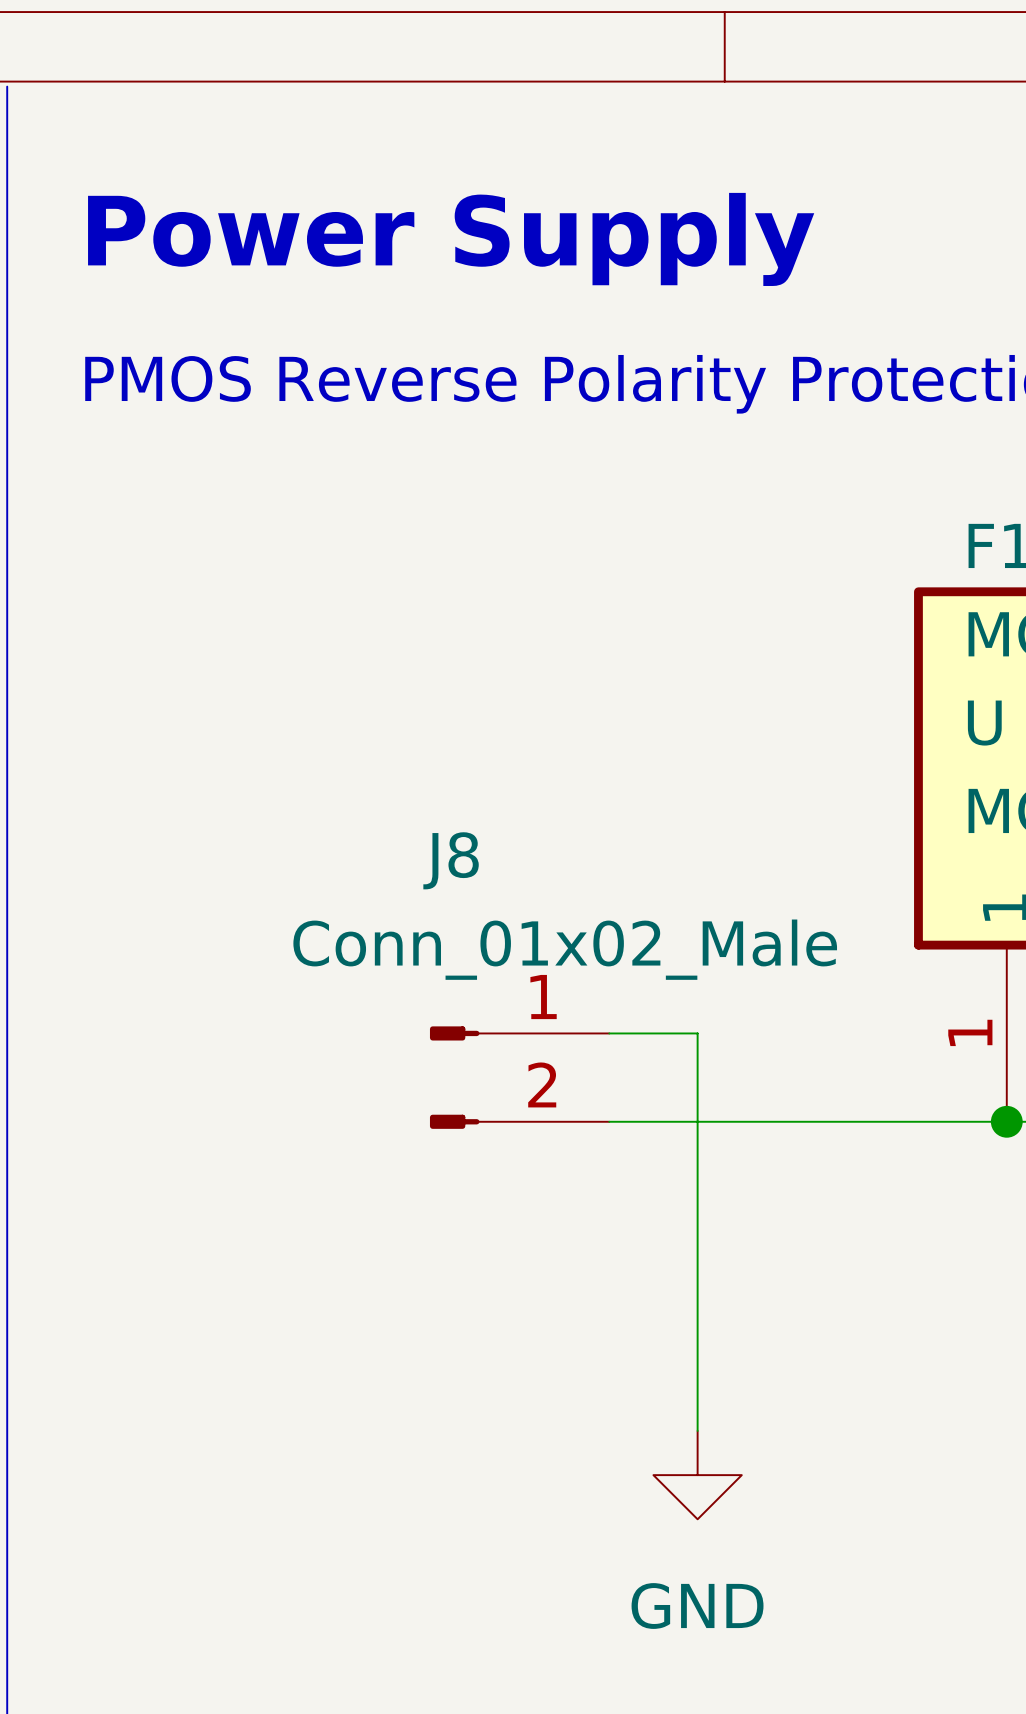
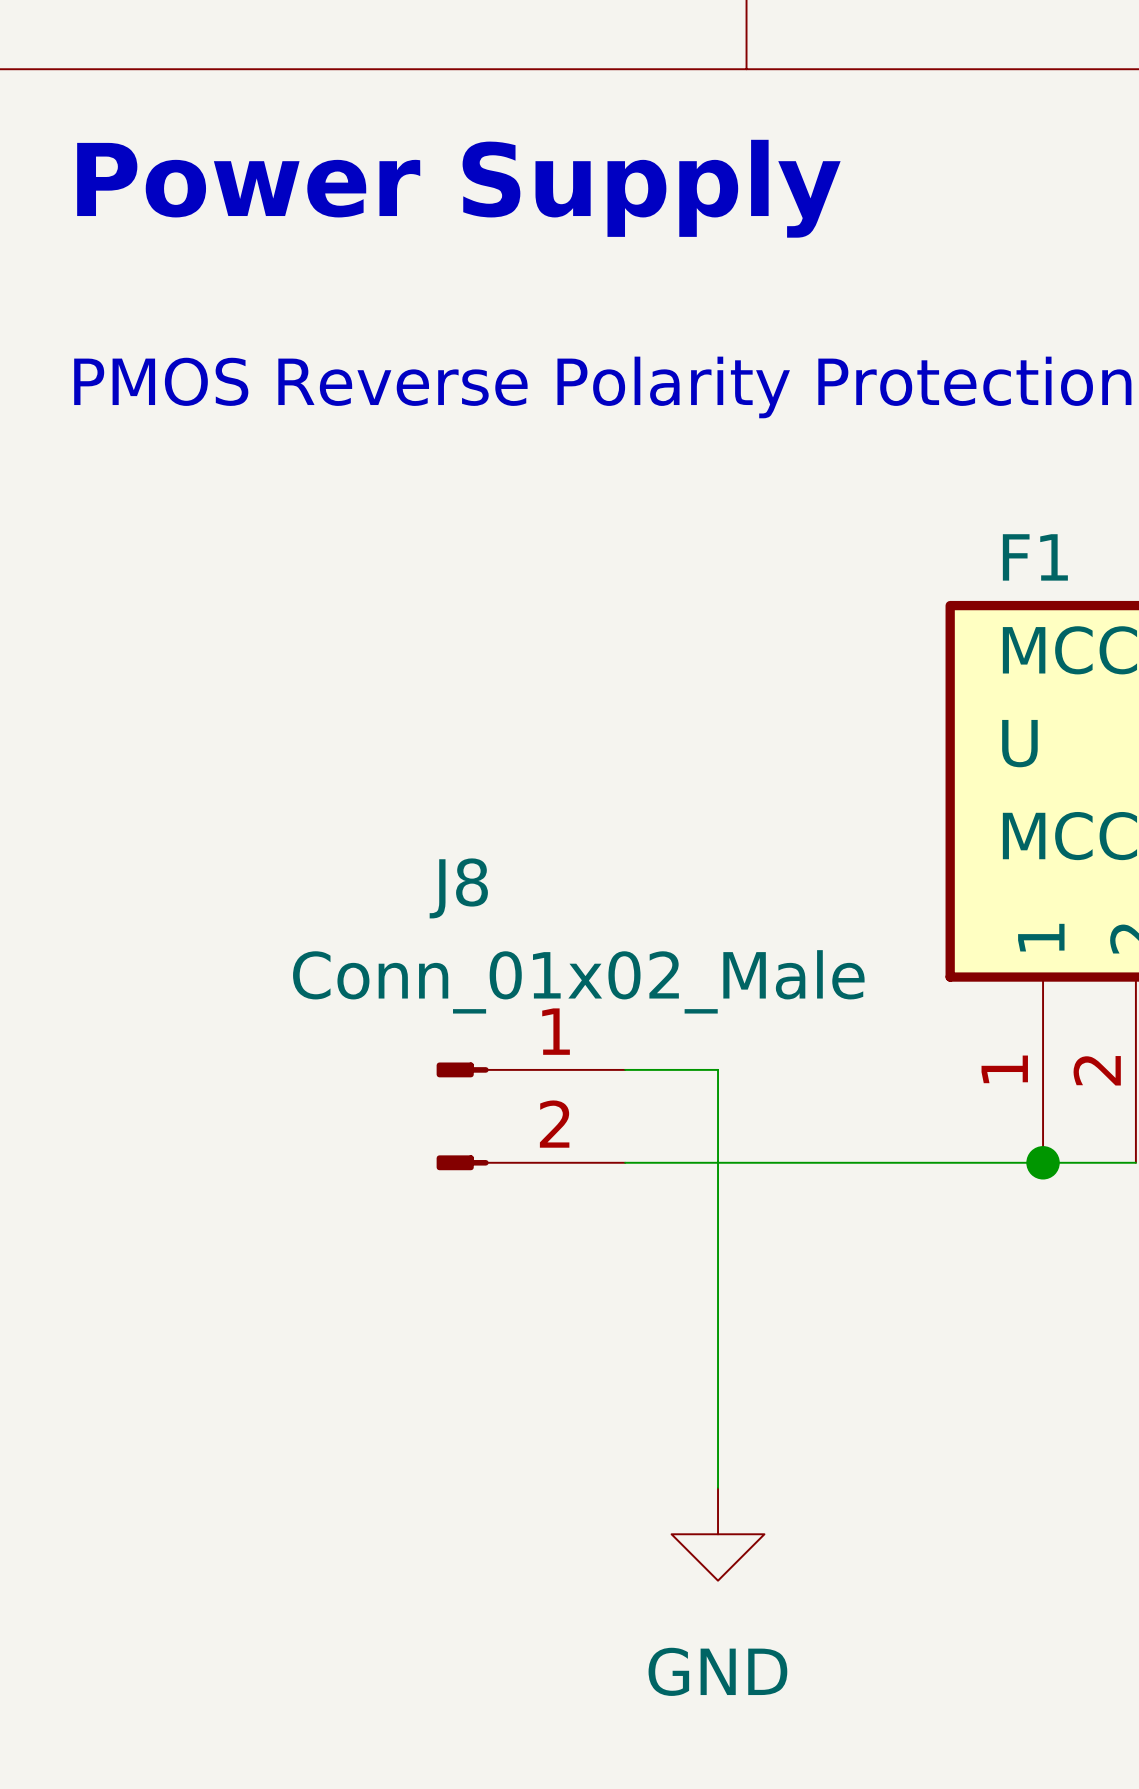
text position: Power Supply (451, 239) -> Power Supply (458, 188)

